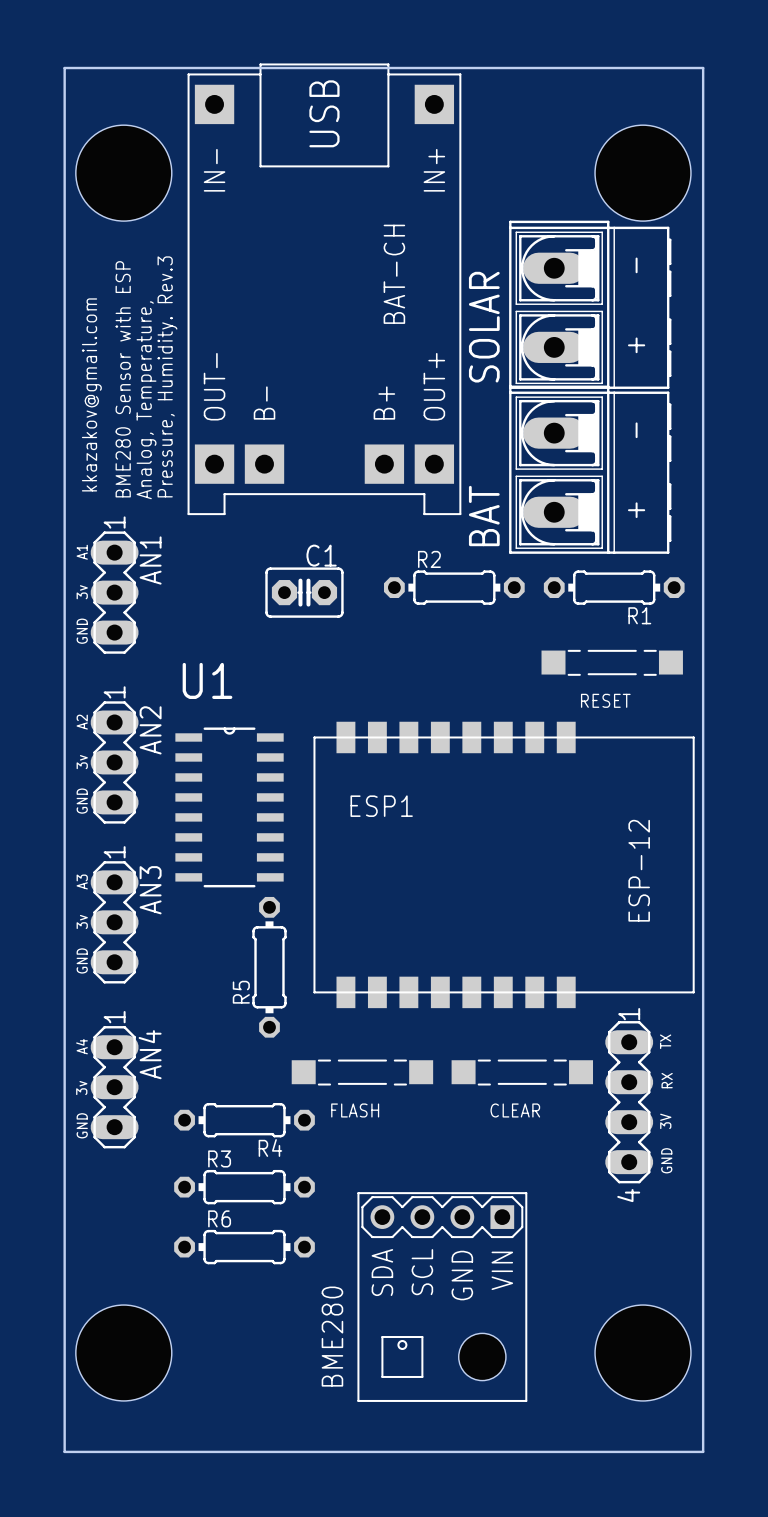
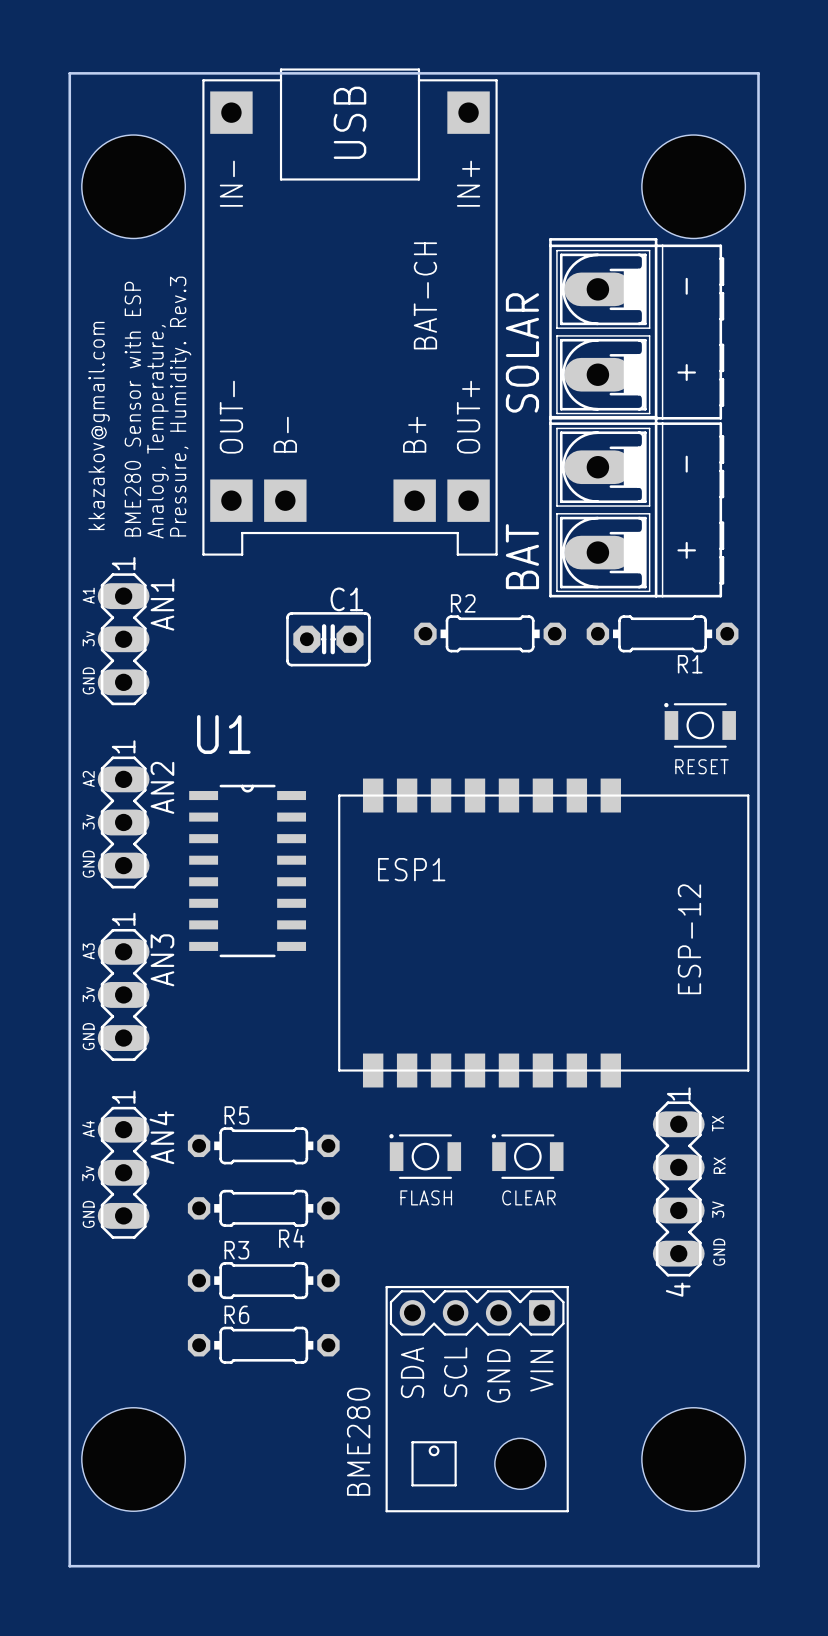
RESET: (612, 662) -> none
RESET: none -> (700, 725)
R5 rotation: 0° (269, 967) -> 90° clockwise (263, 1145)
R5 position: (269, 967) -> (263, 1145)
FLASH: (362, 1072) -> none
FLASH: none -> (425, 1156)
CLEAR: none -> (527, 1156)
CLEAR: (522, 1072) -> none

